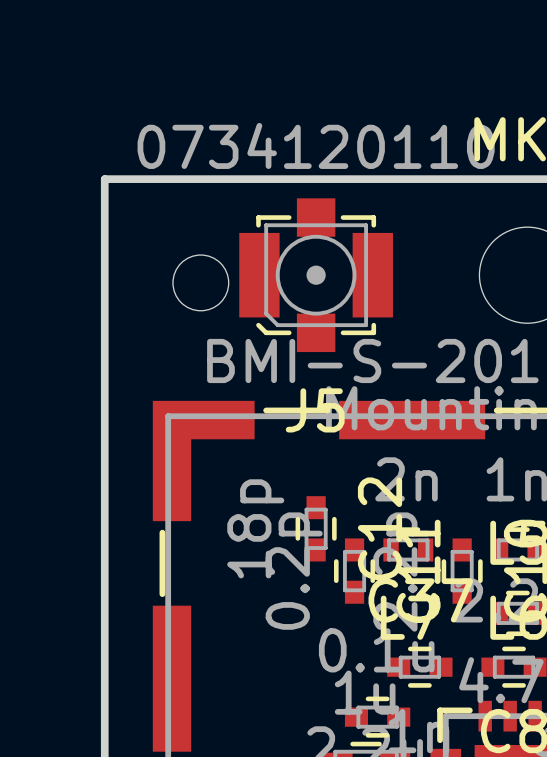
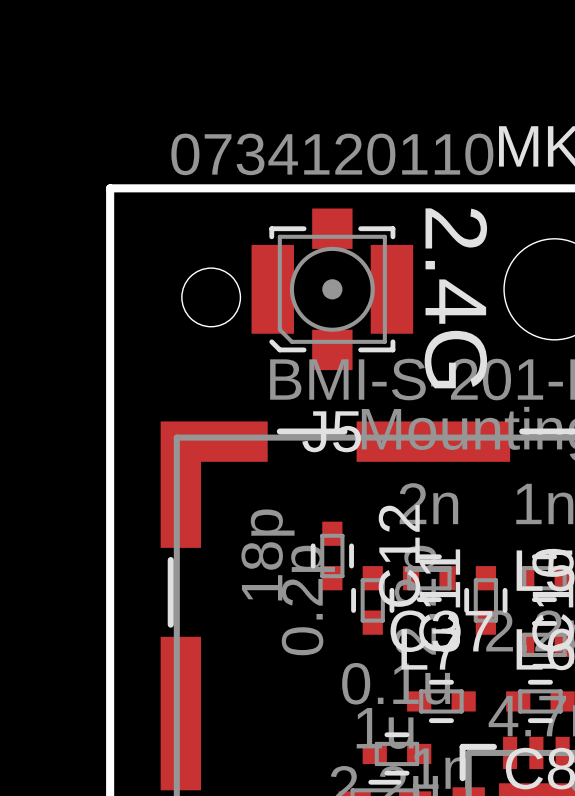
text: none -> 2.4G (455, 298)

